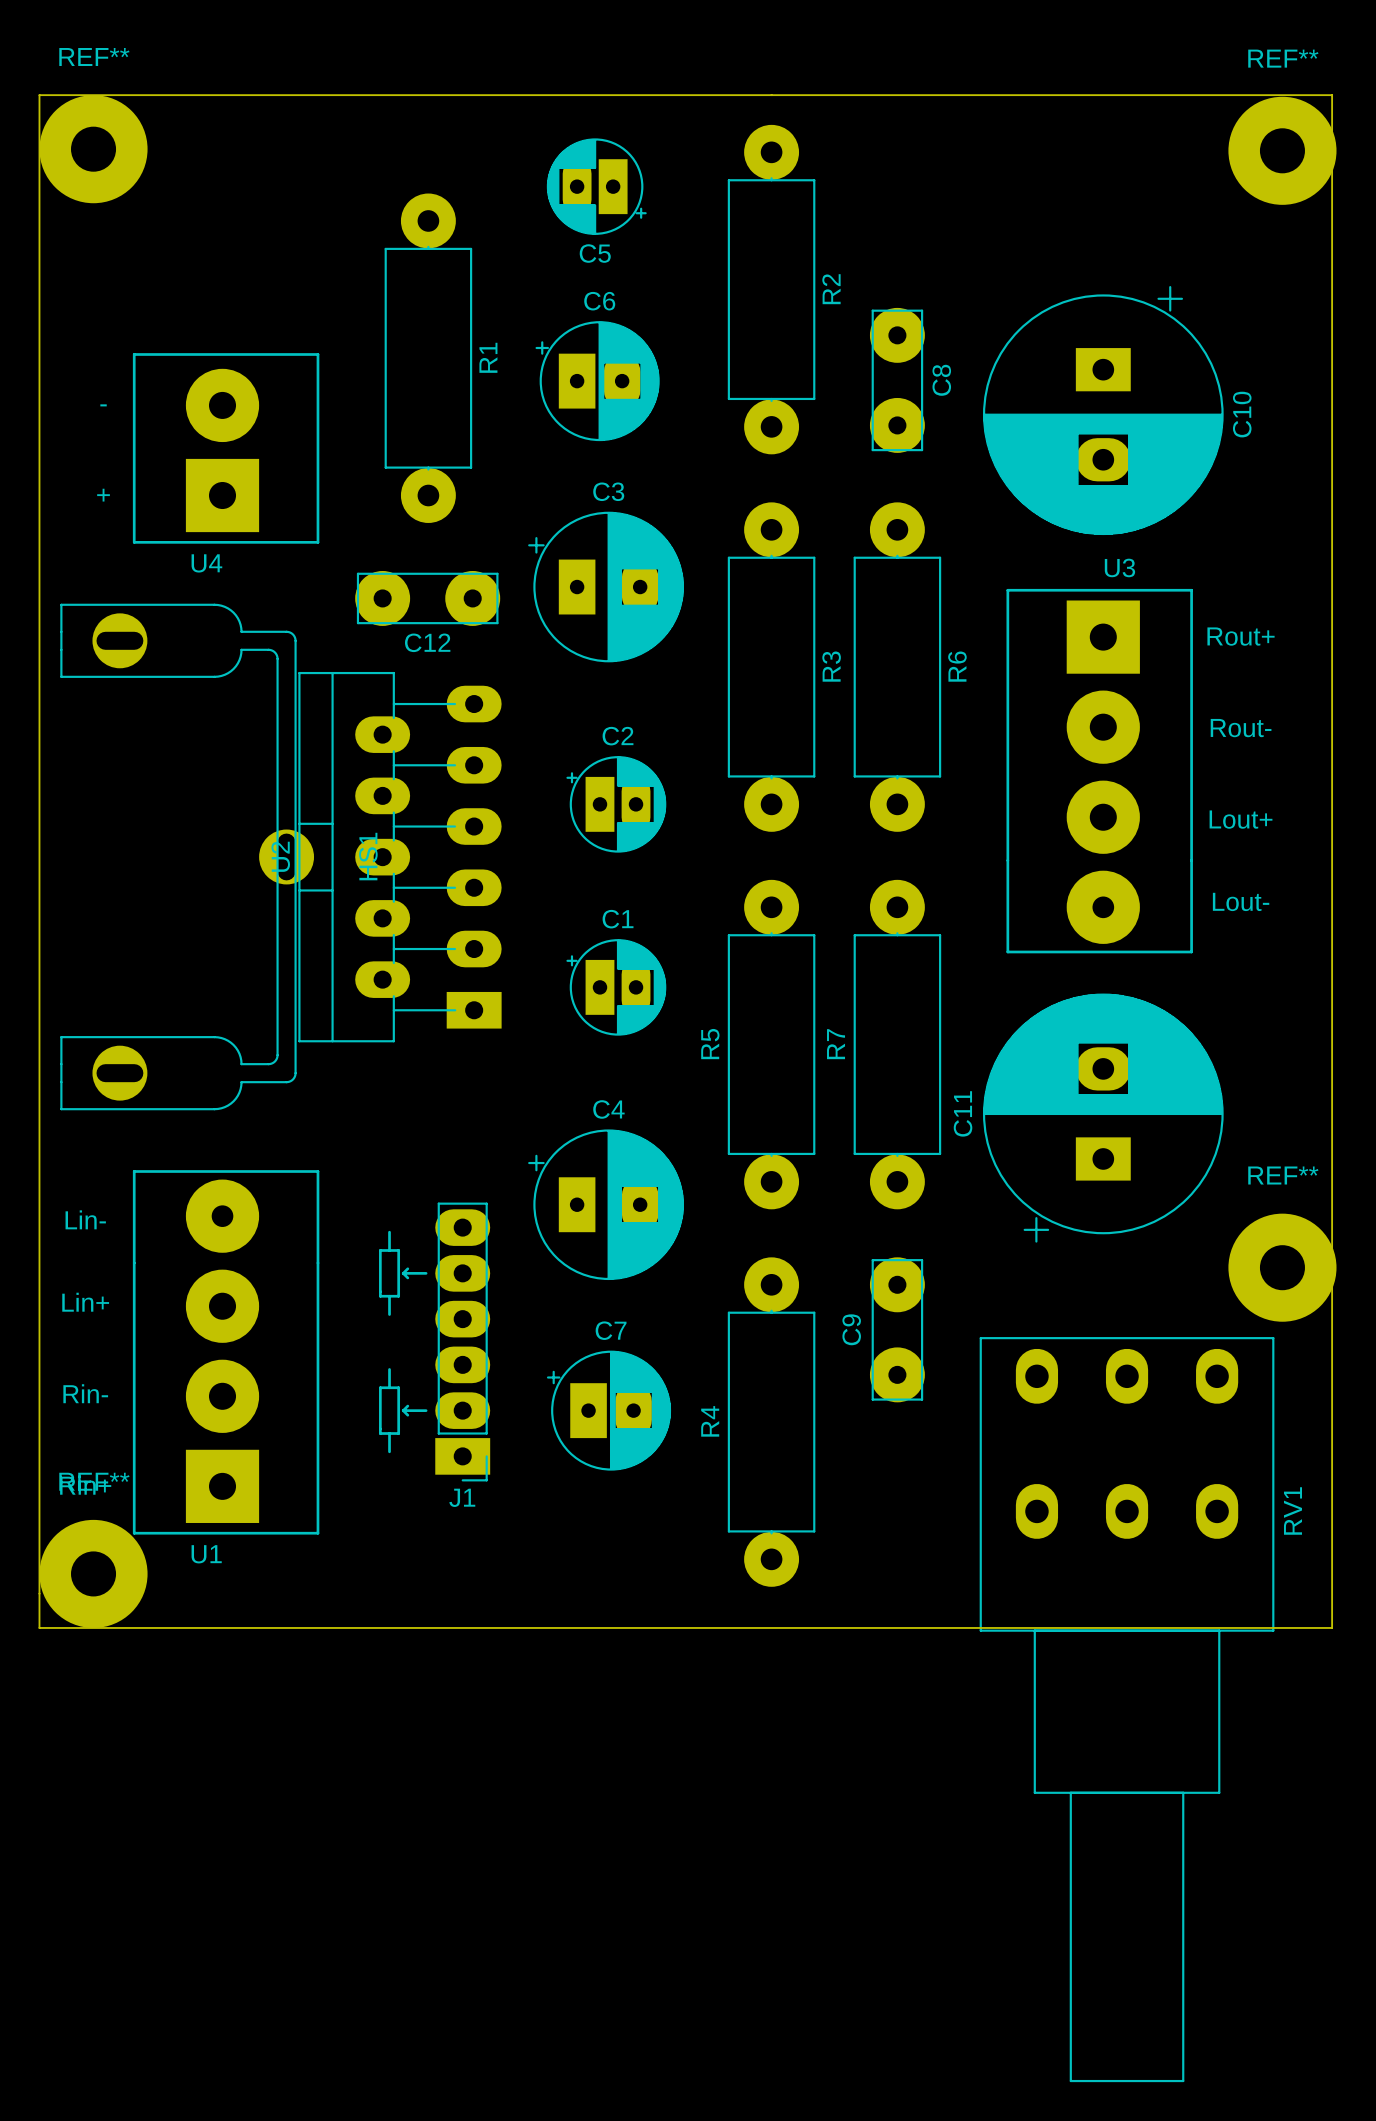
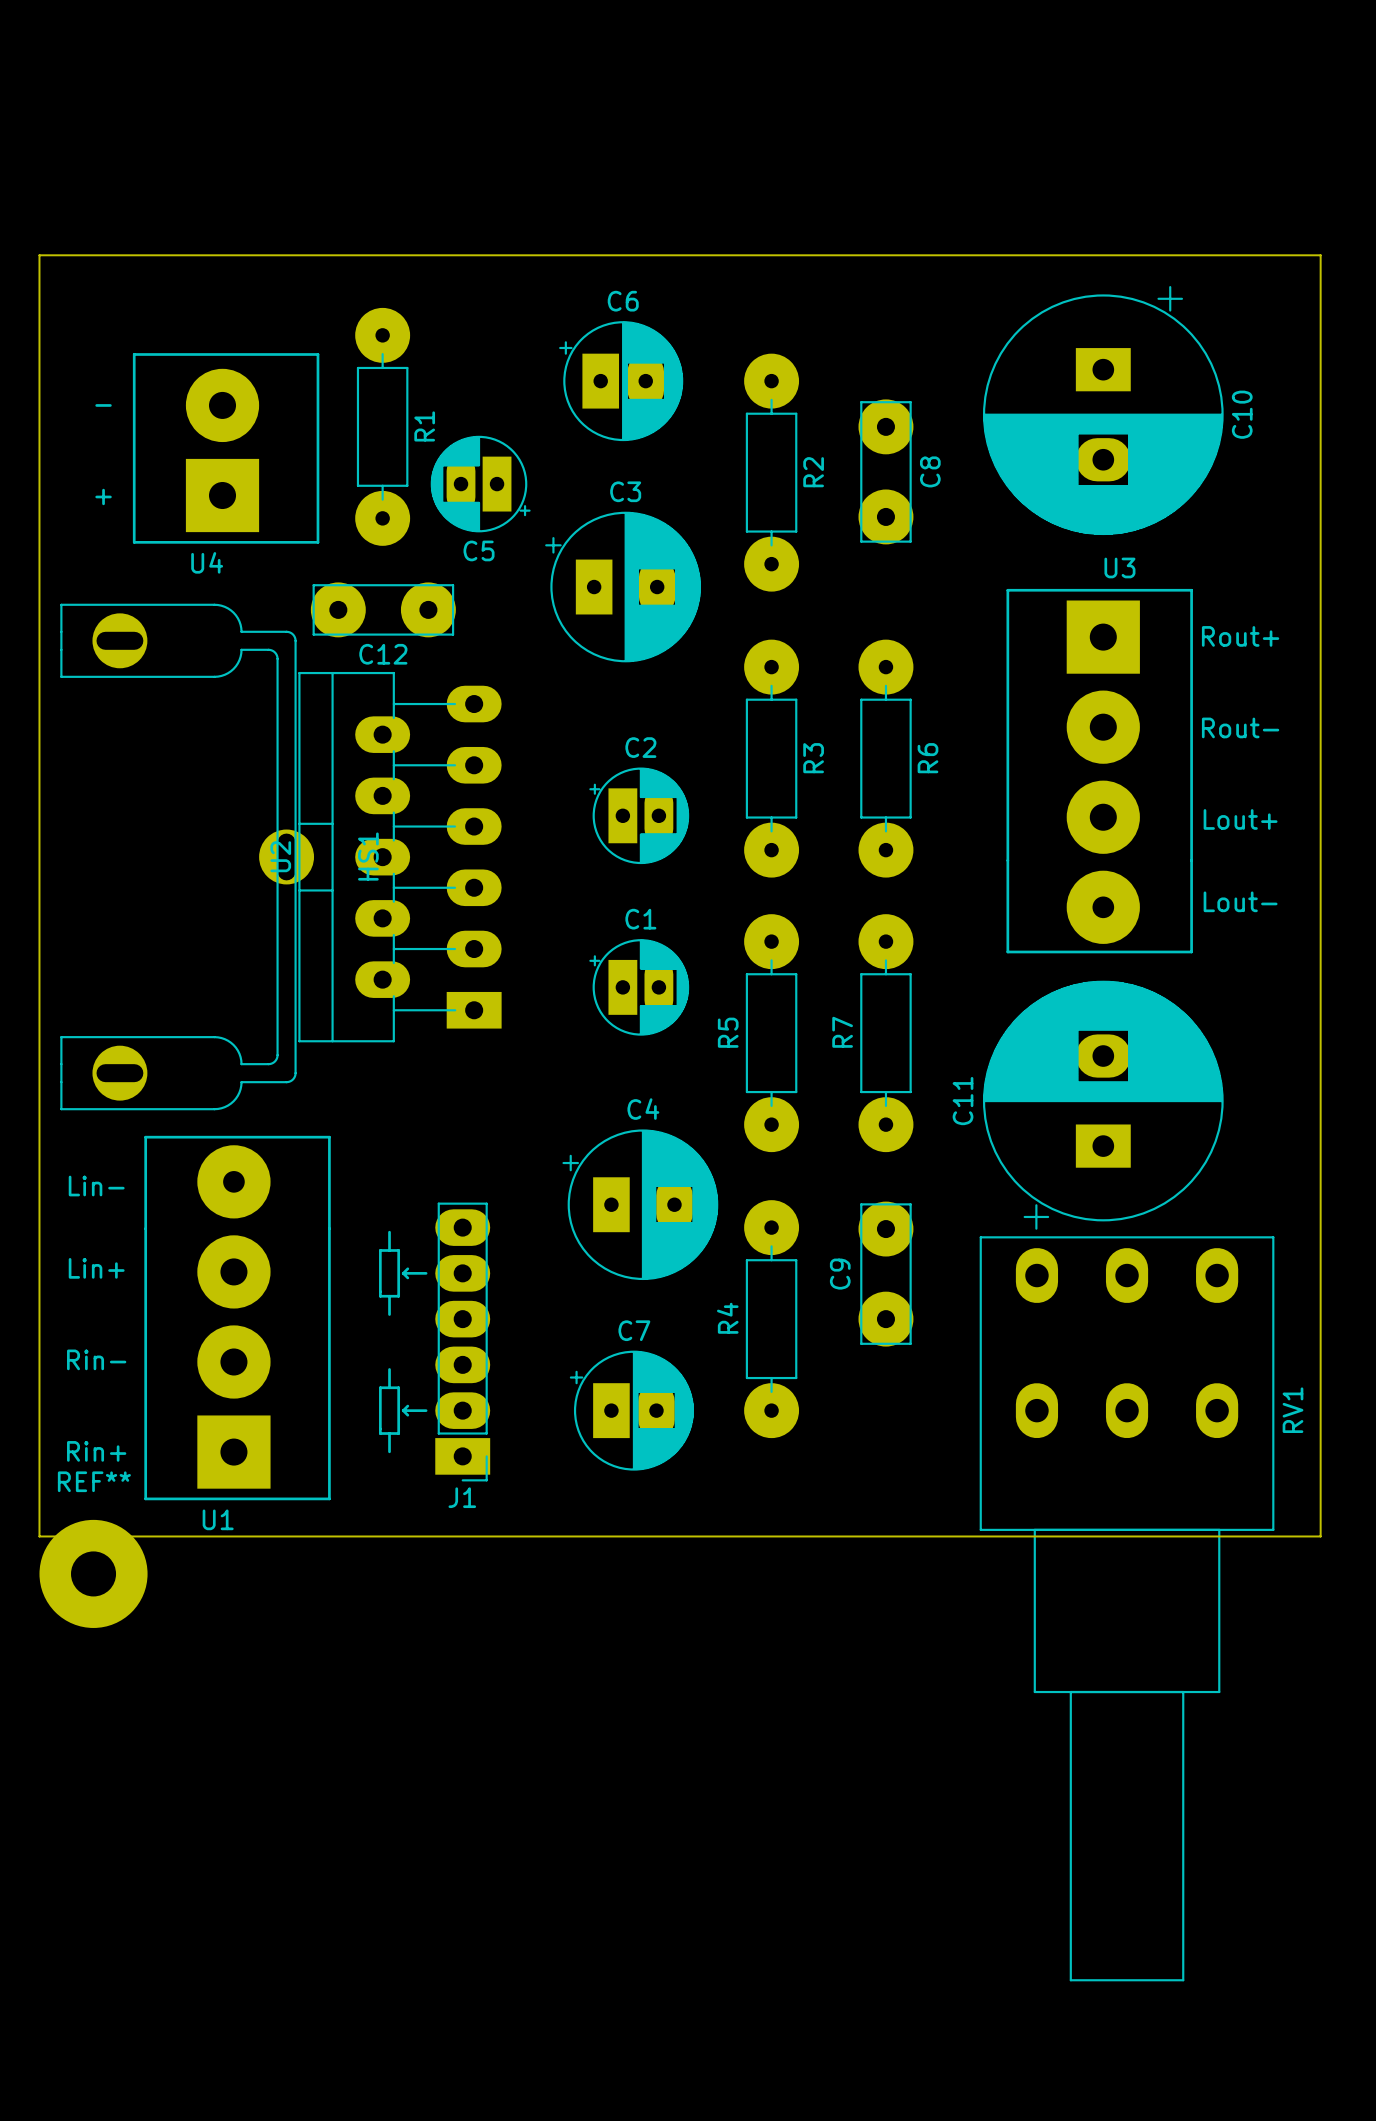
R2 footprint: [727, 124, 816, 455] -> [744, 353, 800, 592]
REF**: (93, 149) -> none
REF**: (1282, 150) -> none
C5 position: (596, 186) -> (480, 484)
R1 footprint: [384, 193, 473, 523] -> [355, 307, 411, 546]
board edge: (39, 255) (39, 95) (1332, 95) (1332, 1627) (39, 1627) (39, 1536) -> (39, 255) (1320, 255) (1320, 1536) (39, 1536)
C8 position: (897, 380) -> (885, 471)
C6 position: (597, 381) -> (621, 381)
R3 footprint: [727, 502, 816, 832] -> [744, 639, 800, 878]
R6 footprint: [853, 502, 942, 832] -> [858, 639, 914, 878]
C3 position: (606, 587) -> (623, 587)
C12 position: (427, 598) -> (383, 609)
C2 position: (616, 804) -> (639, 815)
R5 footprint: [727, 879, 816, 1210] -> [744, 914, 800, 1153]
R7 footprint: [853, 879, 942, 1210] -> [858, 914, 914, 1153]
C1 position: (616, 987) -> (639, 987)
C11 position: (1103, 1118) -> (1103, 1105)
C4 position: (606, 1204) -> (640, 1204)
R4 footprint: [727, 1257, 816, 1587] -> [744, 1200, 800, 1439]
REF**: (1282, 1267) -> none
C9 position: (897, 1329) -> (885, 1274)
U1 position: (226, 1352) -> (237, 1318)
C7 position: (609, 1410) -> (631, 1410)
RV1 position: (1127, 1709) -> (1127, 1608)

